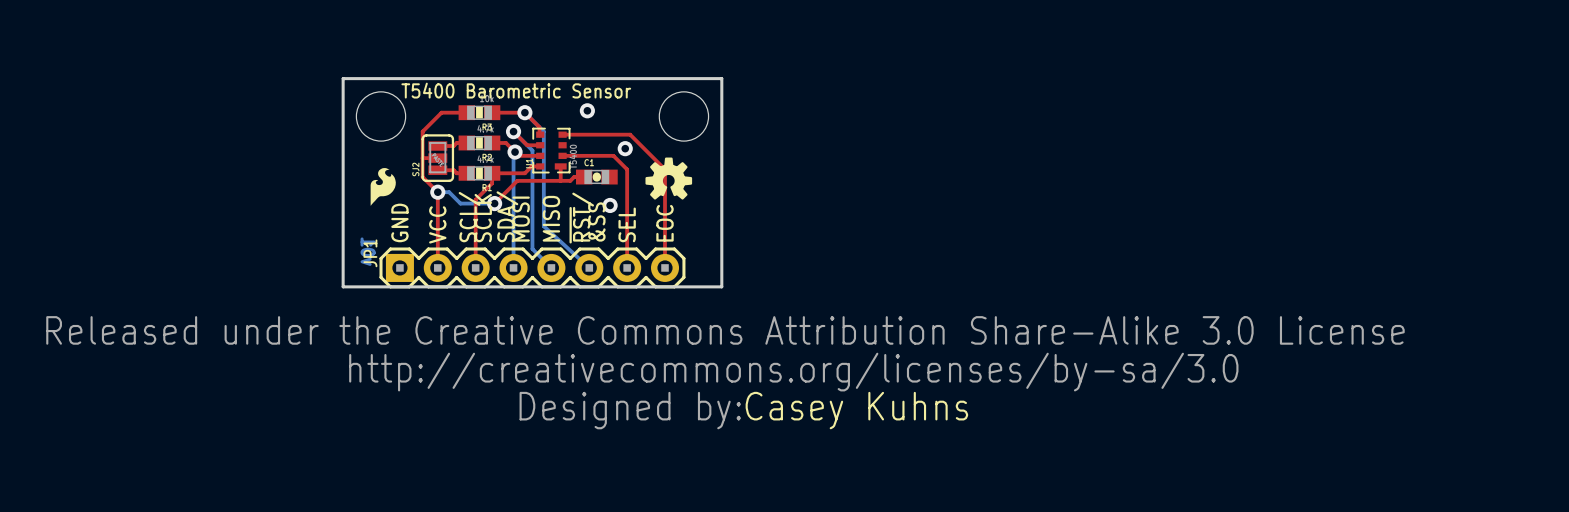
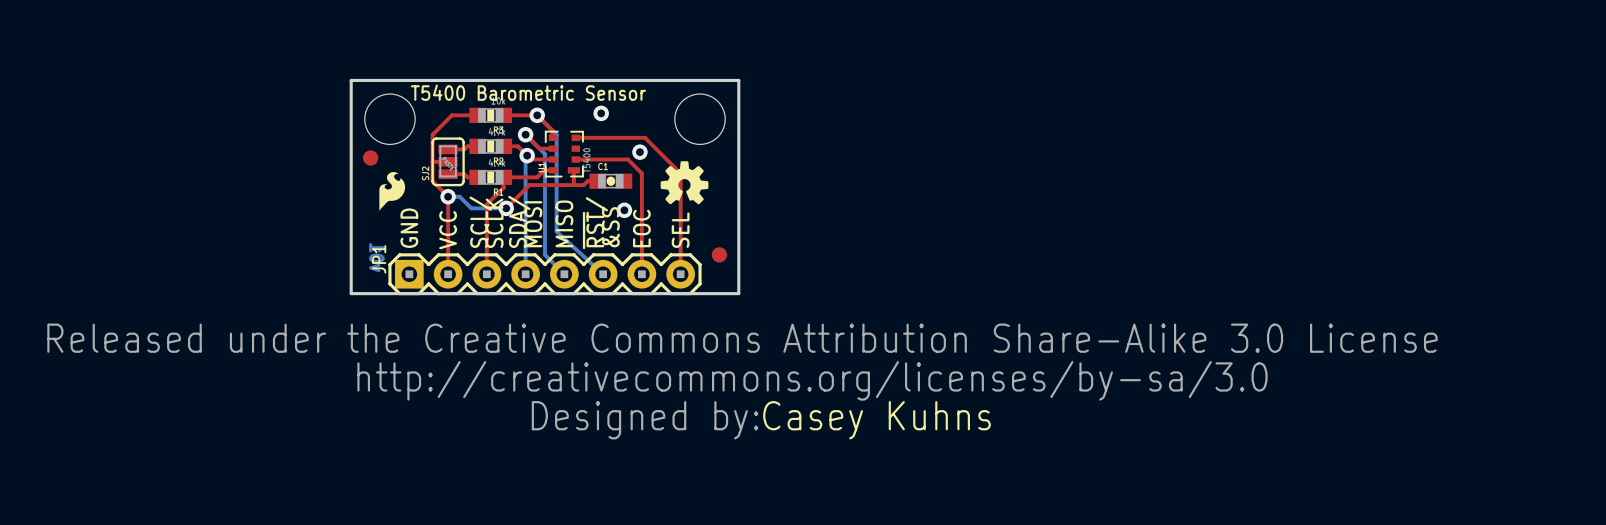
part: none -> (370, 157)
text: EOC (665, 223) -> SEL (680, 230)
text: SEL (627, 224) -> EOC (641, 228)
part: none -> (719, 254)

